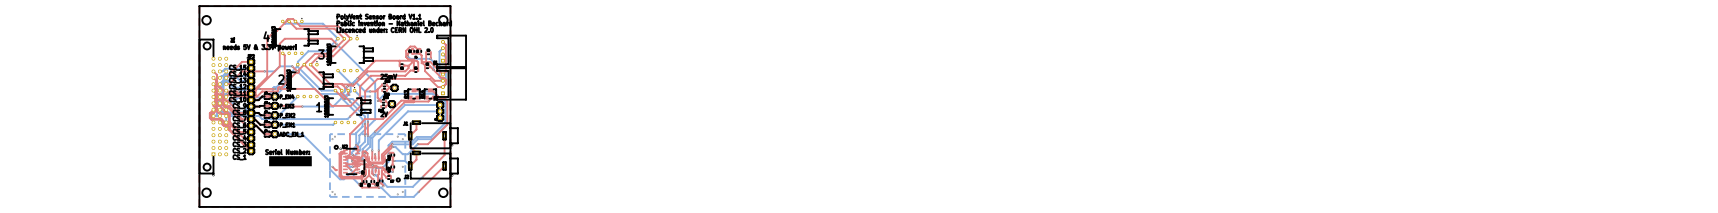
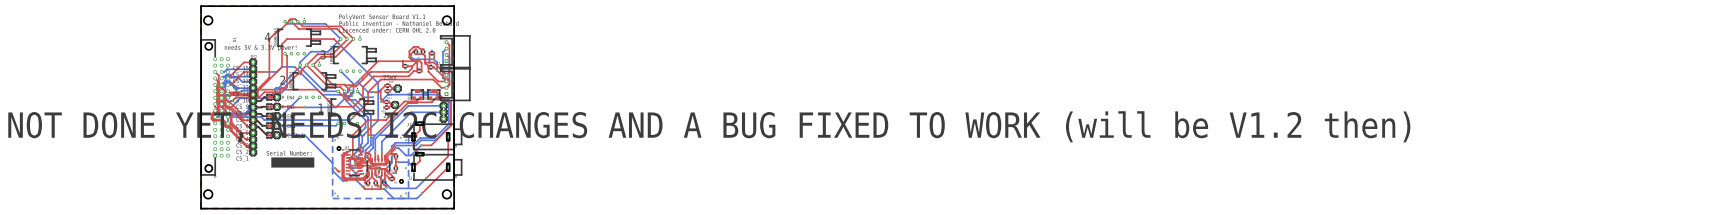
text: none -> NOT DONE YET, NEEDS I2C CHANGES AND A BUG FIXED TO WORK (will be V1.2 then) (709, 126)

